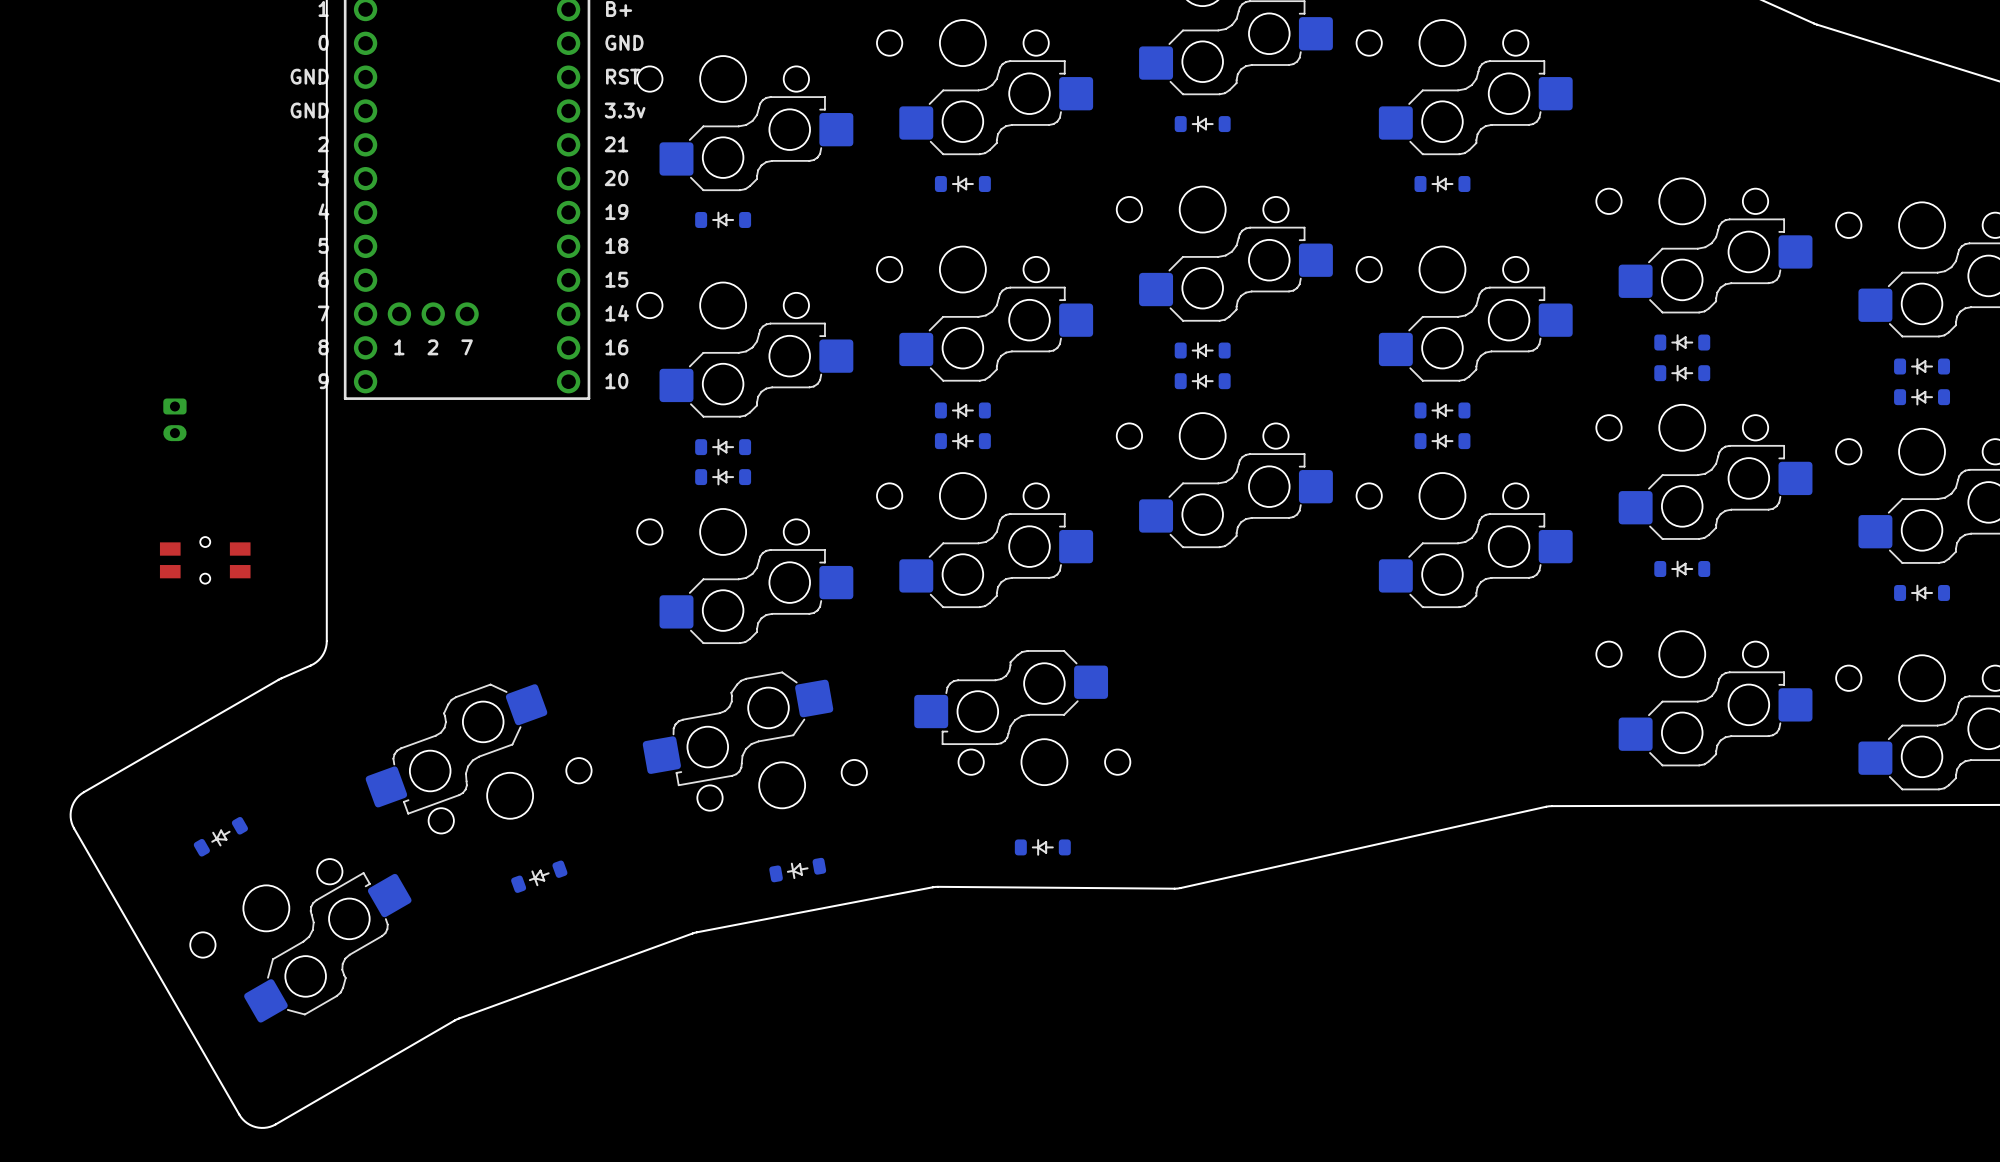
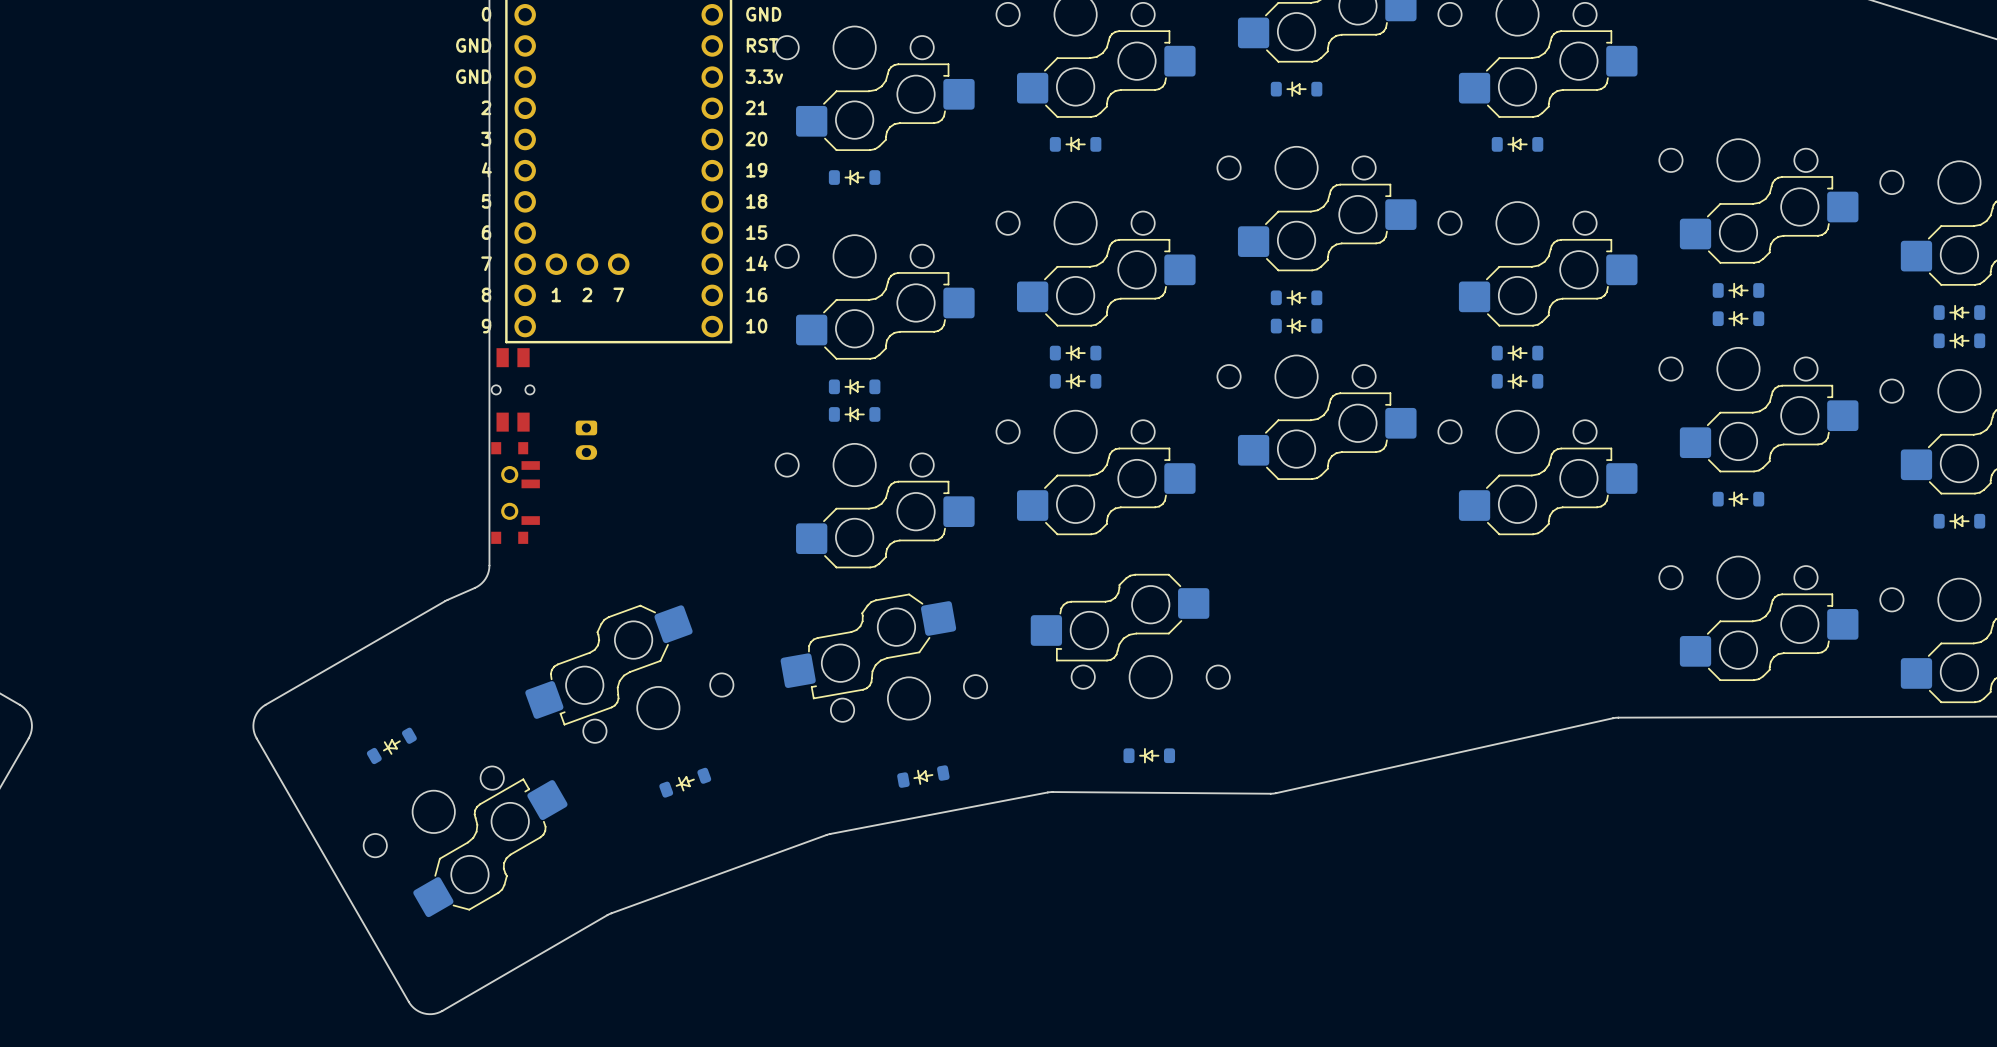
part position: (174, 419) -> (586, 440)
part rotation: 0° (205, 560) -> 90° clockwise (513, 389)
part position: (205, 560) -> (513, 389)
part: none -> (515, 493)

